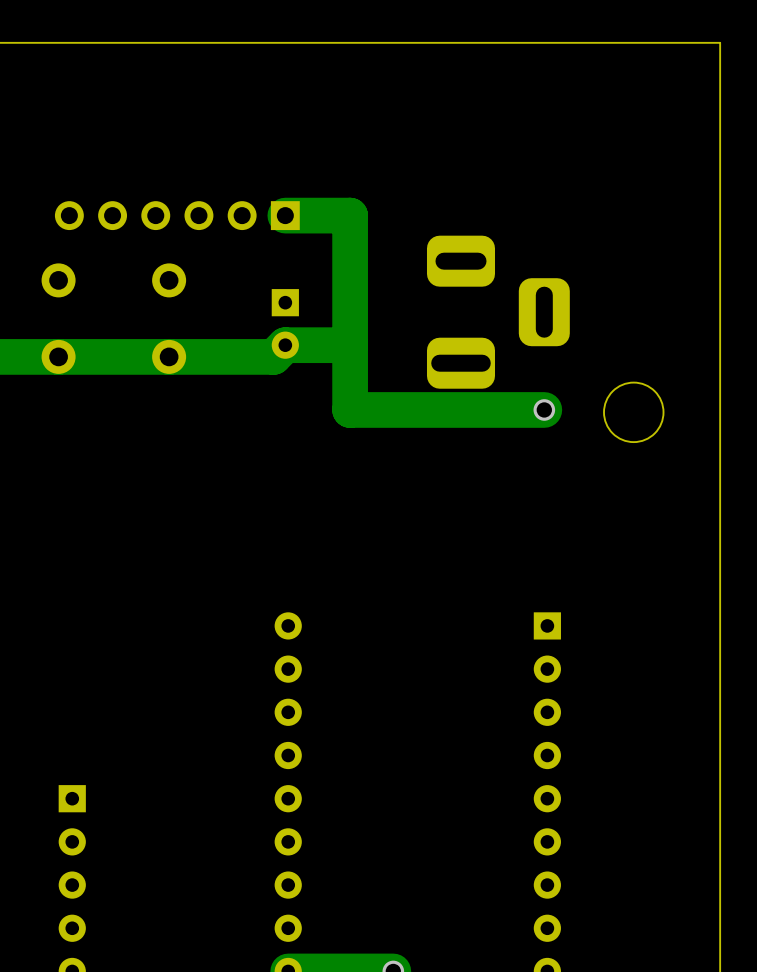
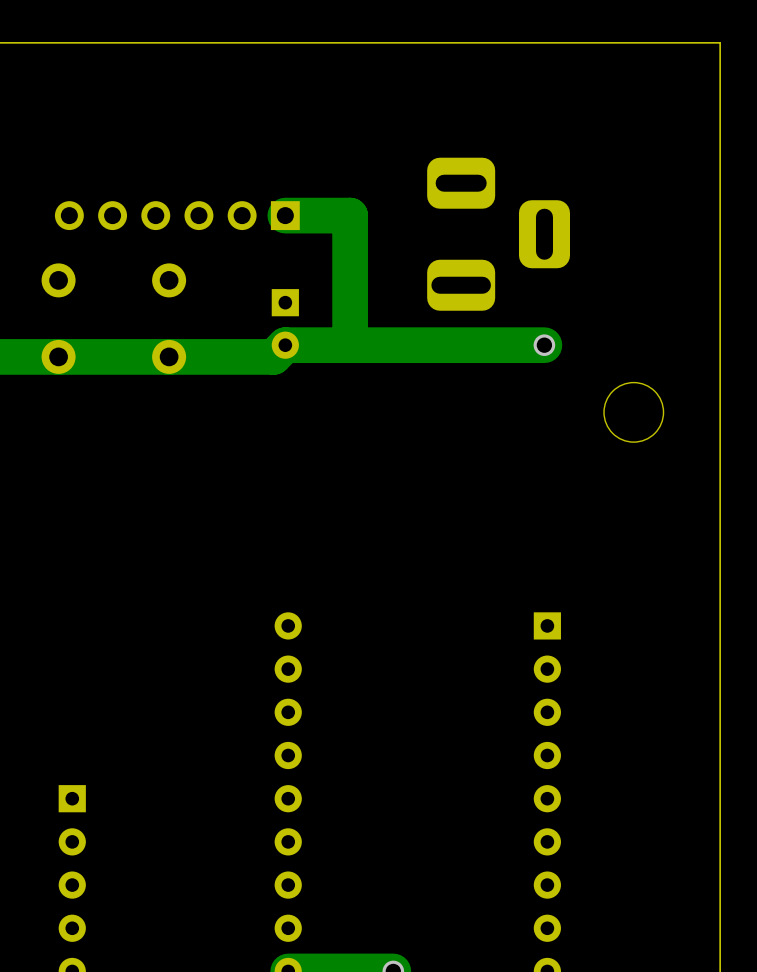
part position: (498, 312) -> (498, 234)
track: (350, 345) (350, 409) (544, 409) -> (350, 345) (544, 345)
via position: (544, 409) -> (544, 345)

